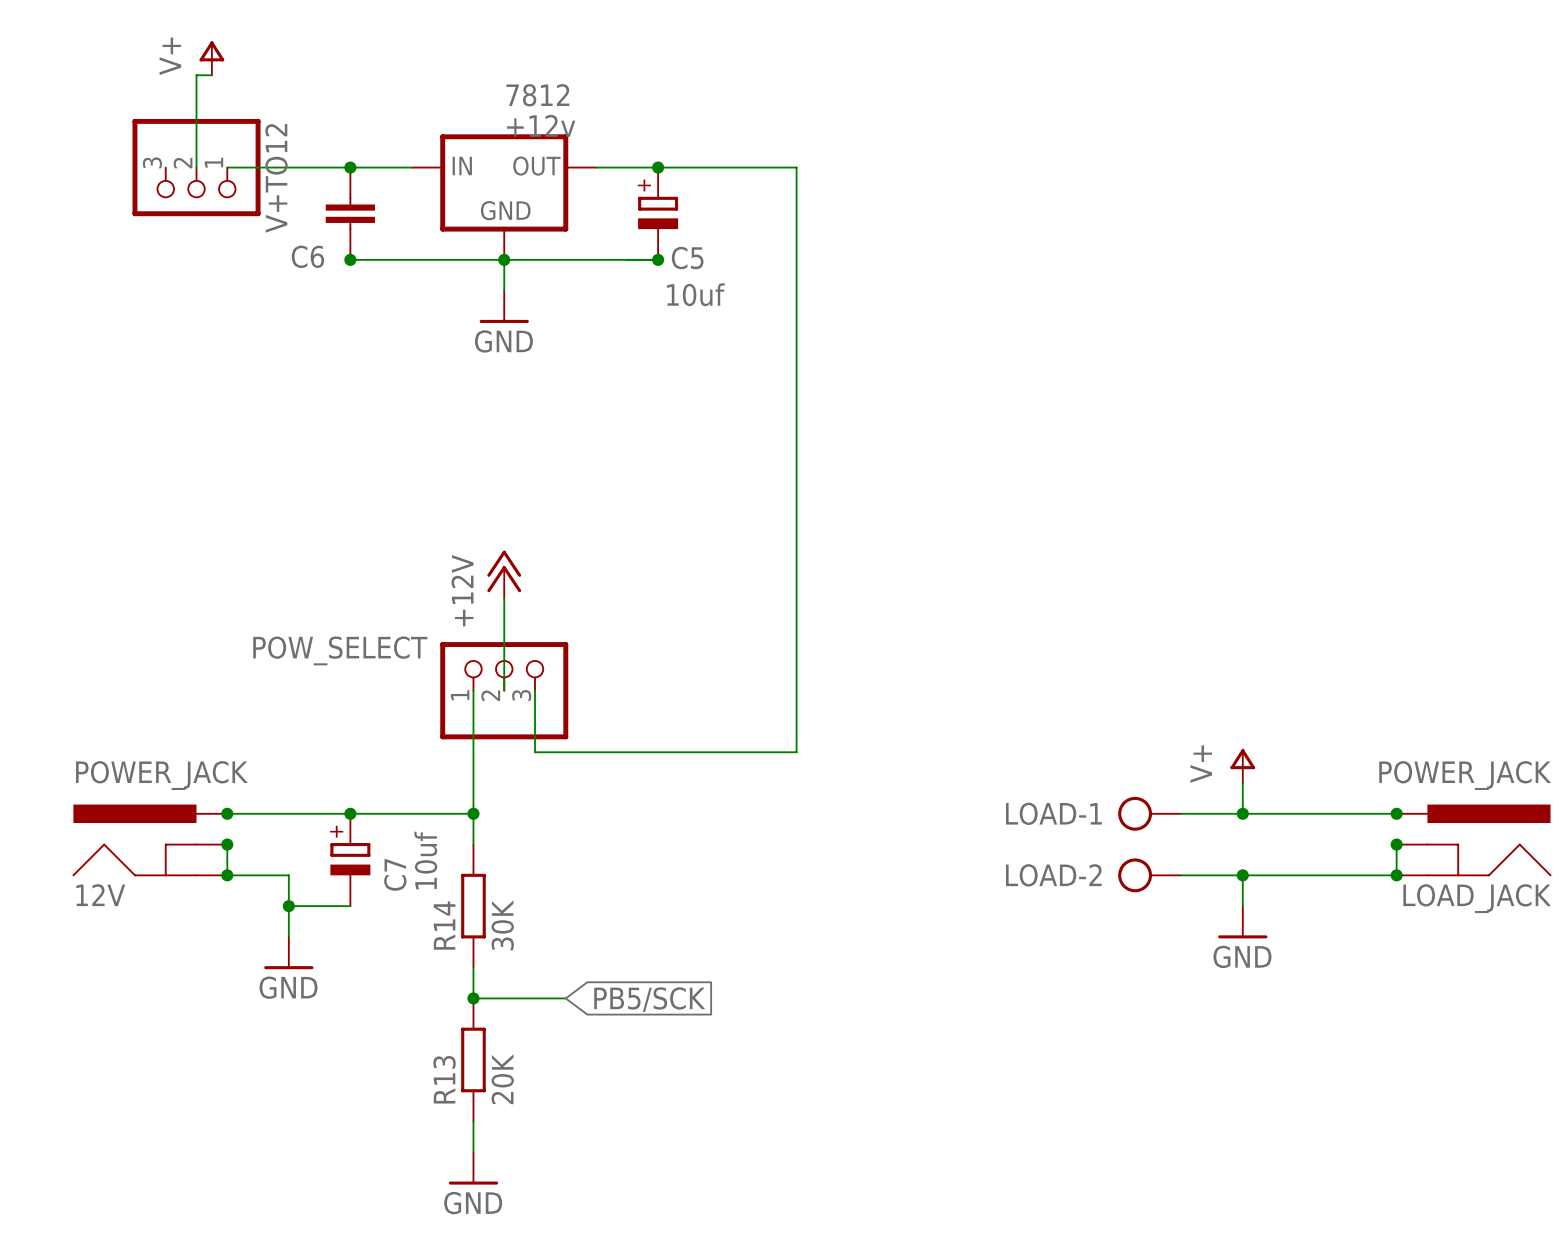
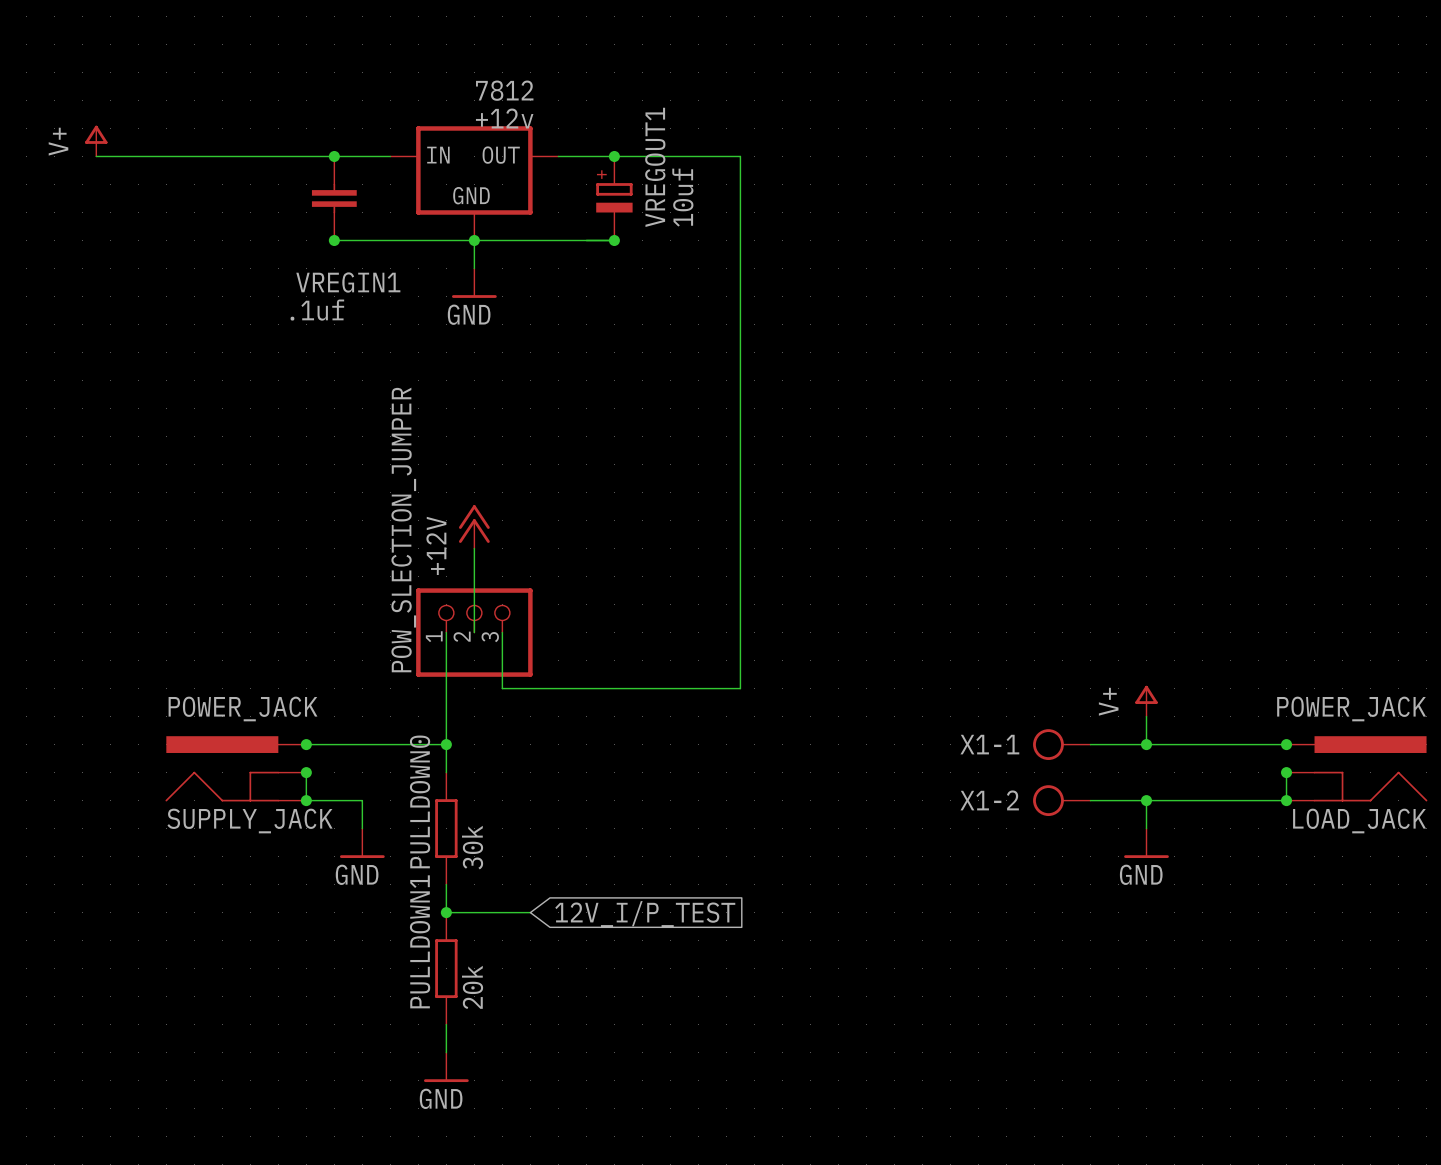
power symbol position: V+ (211, 58) -> V+ (96, 141)
wire: (211, 75) (196, 75) (196, 167) -> none
wire: none -> (96, 156) (222, 156)
V+TO12: (196, 167) -> none
C6 name: C6 (307, 256) -> VREGIN1 (348, 282)
C5 name: C5 (687, 258) -> VREGOUT1 (655, 167)
C5 value rotation: 0° (695, 294) -> 90° counterclockwise (682, 197)
C5 value position: 10uf (695, 294) -> 10uf (682, 197)
C6 value: none -> .1uf (317, 310)
POW_SELECT name: POW_SELECT (340, 650) -> POW_SLECTION_JUMPER (403, 530)
junction: (227, 813) -> none
junction: none -> (306, 744)
junction: (350, 813) -> none
LOAD-1 name: LOAD-1 (1053, 813) -> X1-1 (989, 744)
12V: POWER_JACK (149, 840) -> none
SUPPLY_JACK: none -> POWER_JACK (235, 768)
wire: (227, 844) (227, 875) (288, 875) (288, 936) -> none
junction: (227, 844) -> none
wire: none -> (306, 772) (306, 800) (362, 800) (362, 828)
junction: none -> (306, 772)
C7: 10uf (350, 859) -> none
junction: (227, 875) -> none
junction: none -> (306, 800)
LOAD-2 name: LOAD-2 (1053, 875) -> X1-2 (989, 800)
wire: (288, 906) (350, 906) -> none
junction: (288, 906) -> none
R14 name: R14 (444, 925) -> PULLDOWN0 (420, 801)
R14 value: 30K (502, 925) -> 30k (472, 847)
power symbol position: GND (288, 953) -> GND (362, 843)
global label: PB5/SCK (649, 999) -> 12V_I/P_TEST (645, 914)
R13 name: R13 (444, 1079) -> PULLDOWN1 (420, 941)
R13 value: 20K (502, 1079) -> 20k (472, 987)

